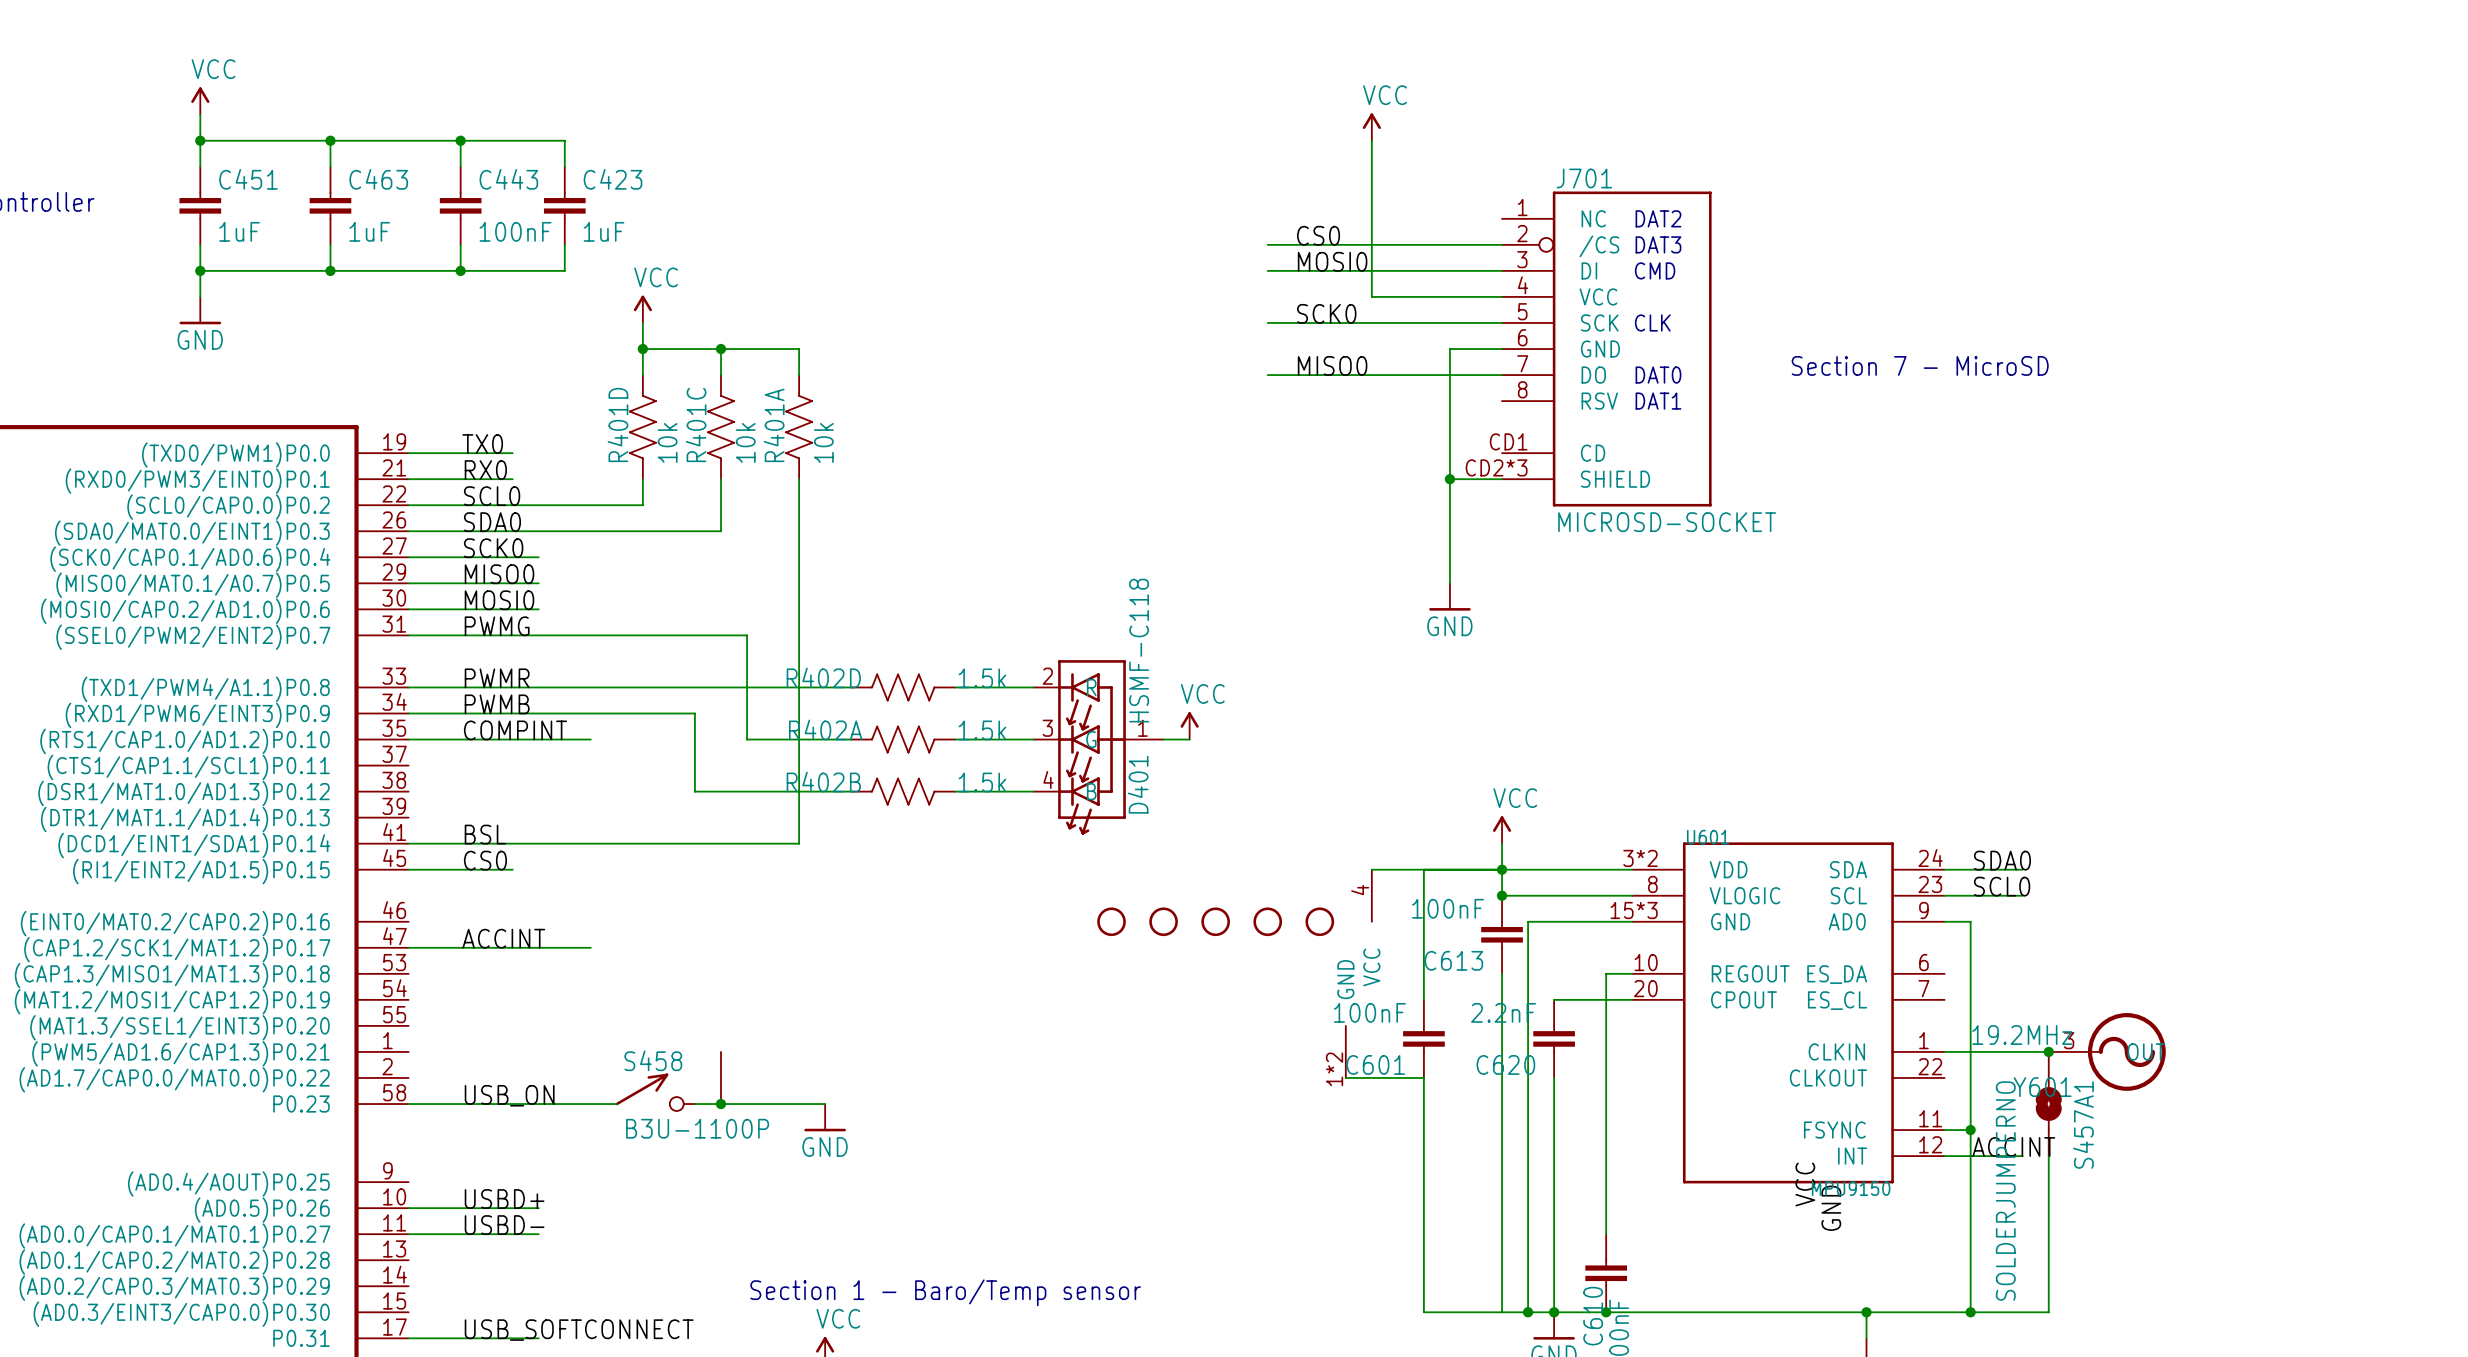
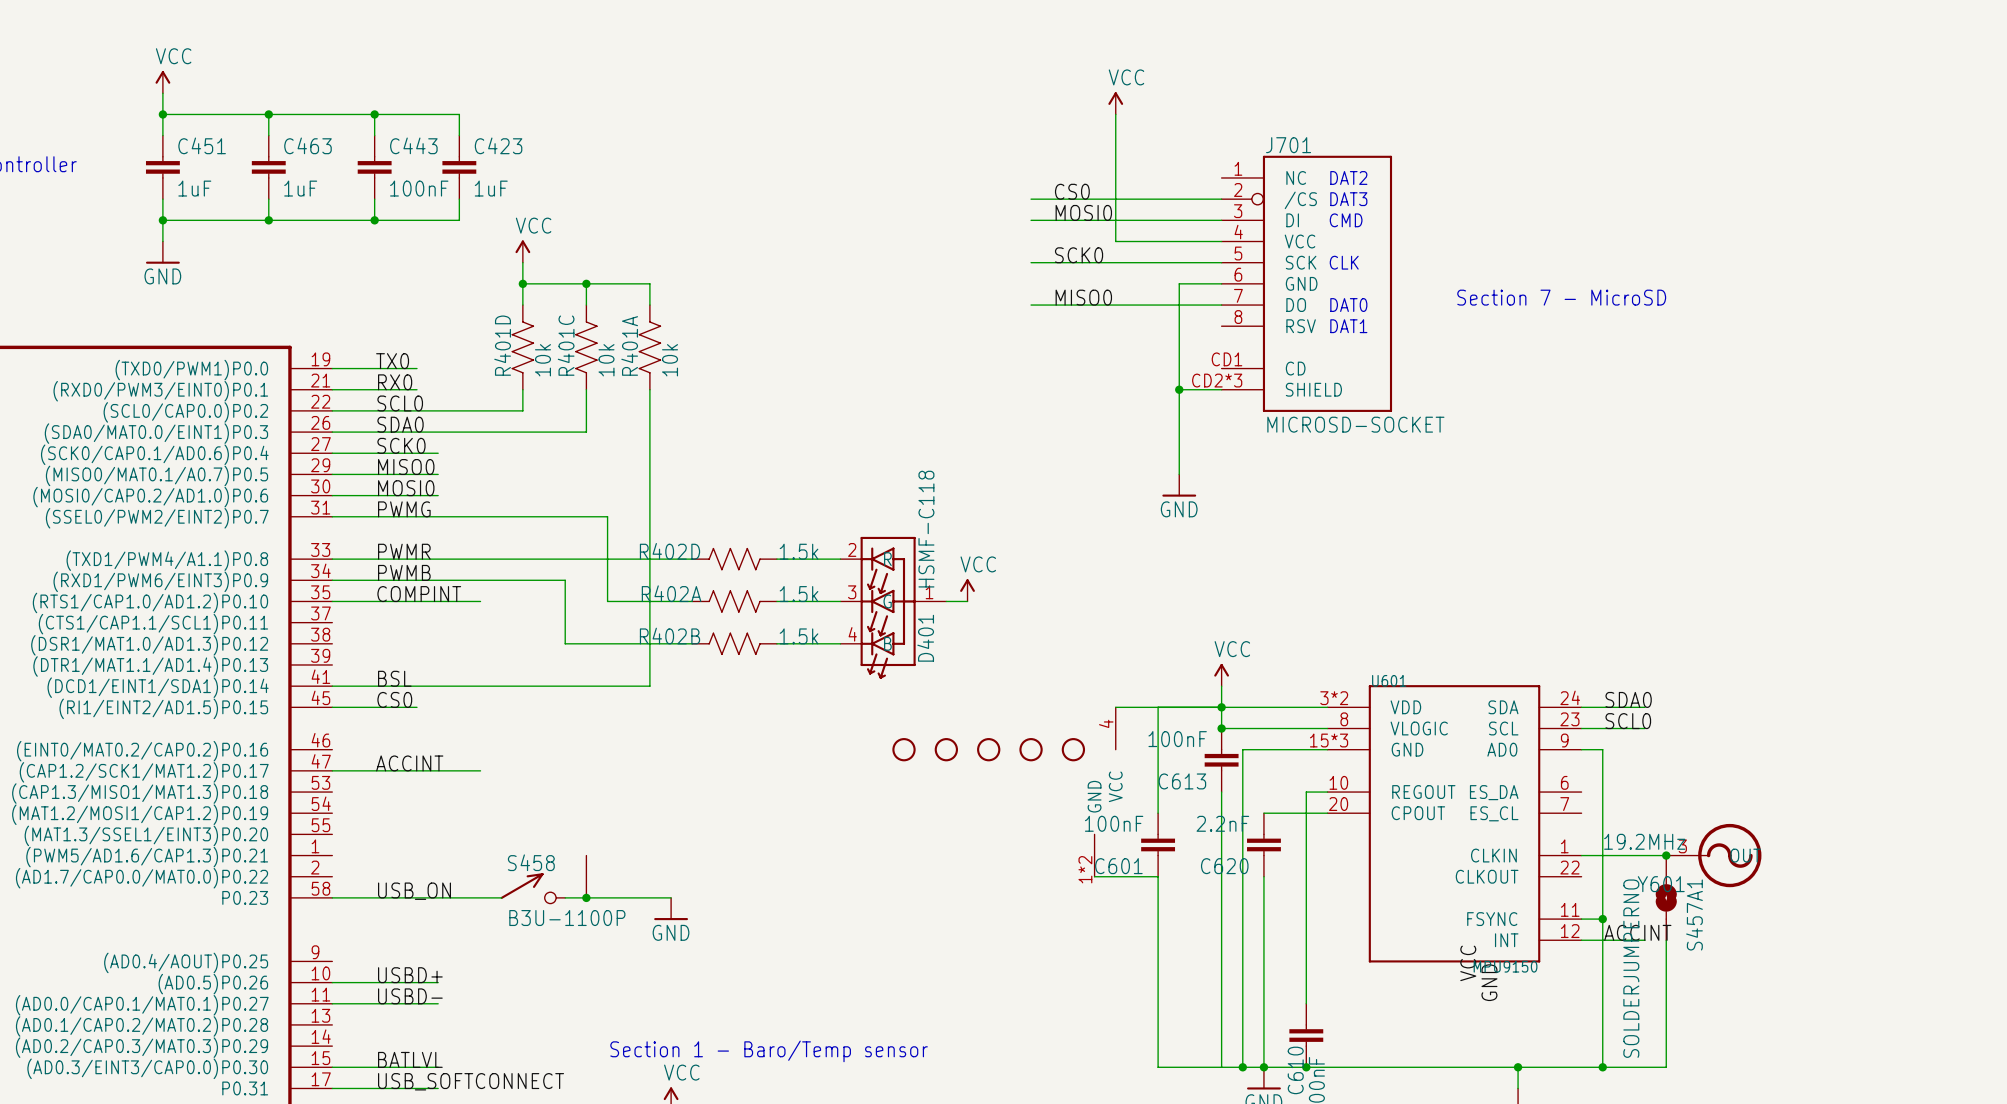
label: none -> BATLVL (410, 1059)
wire: none -> (332, 1067) (438, 1067)

